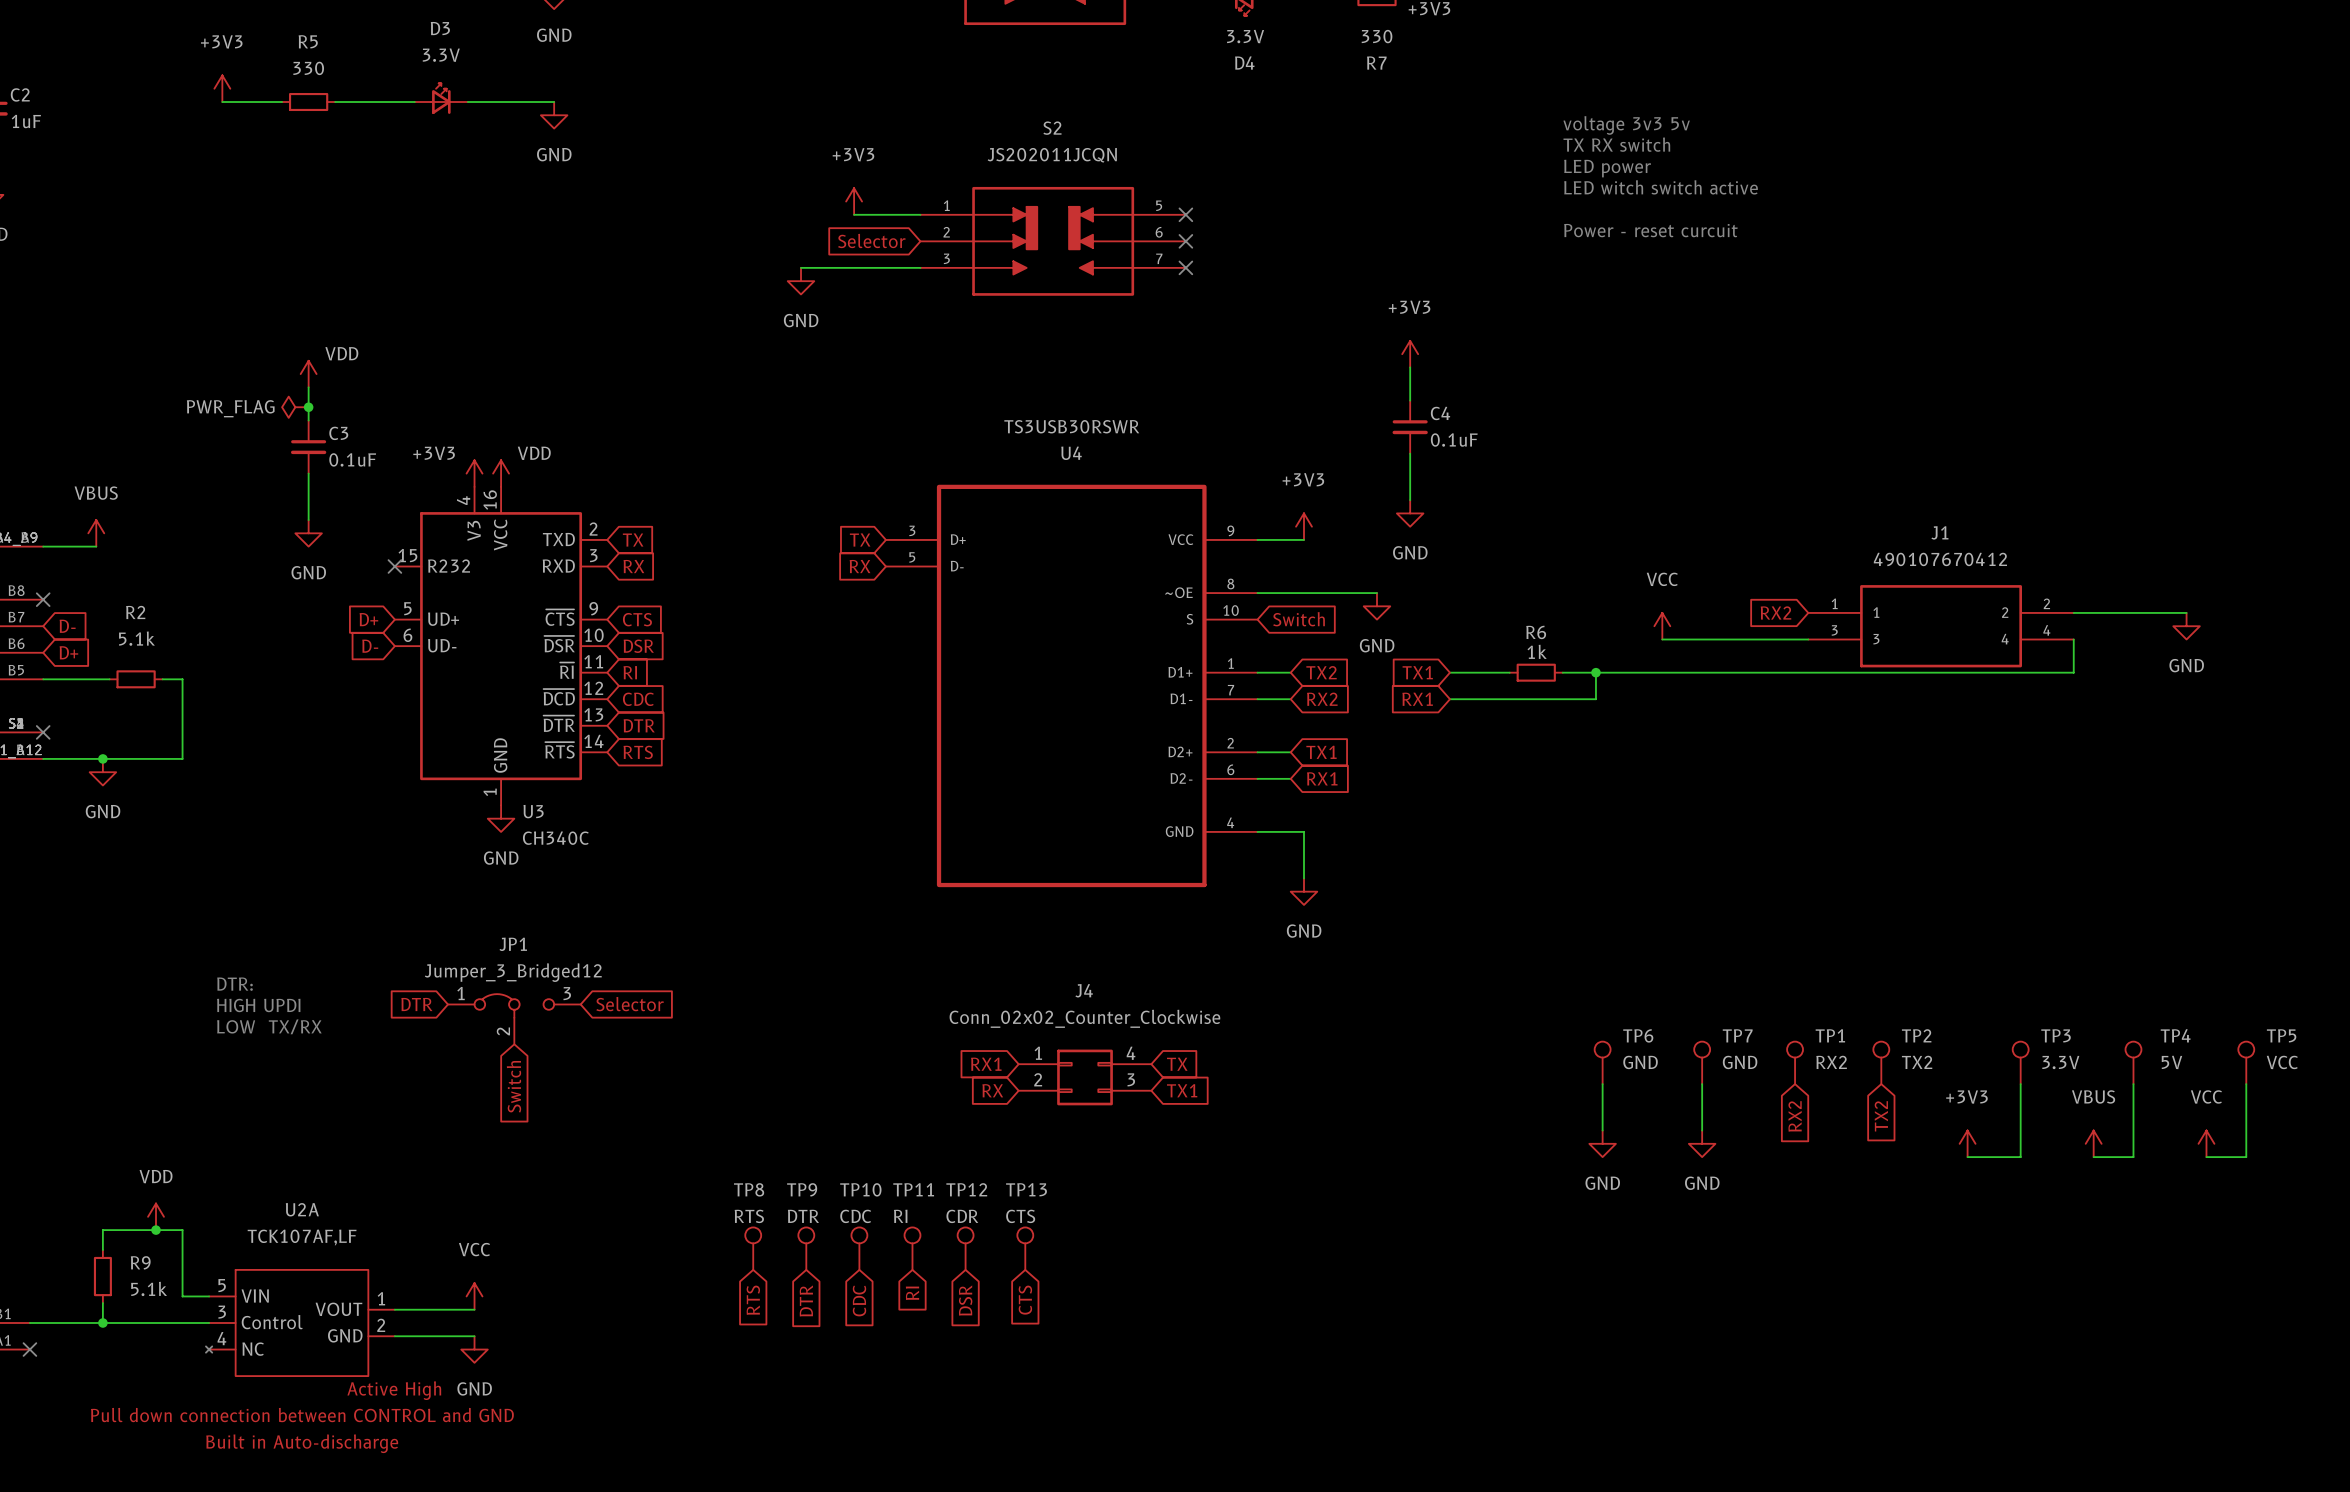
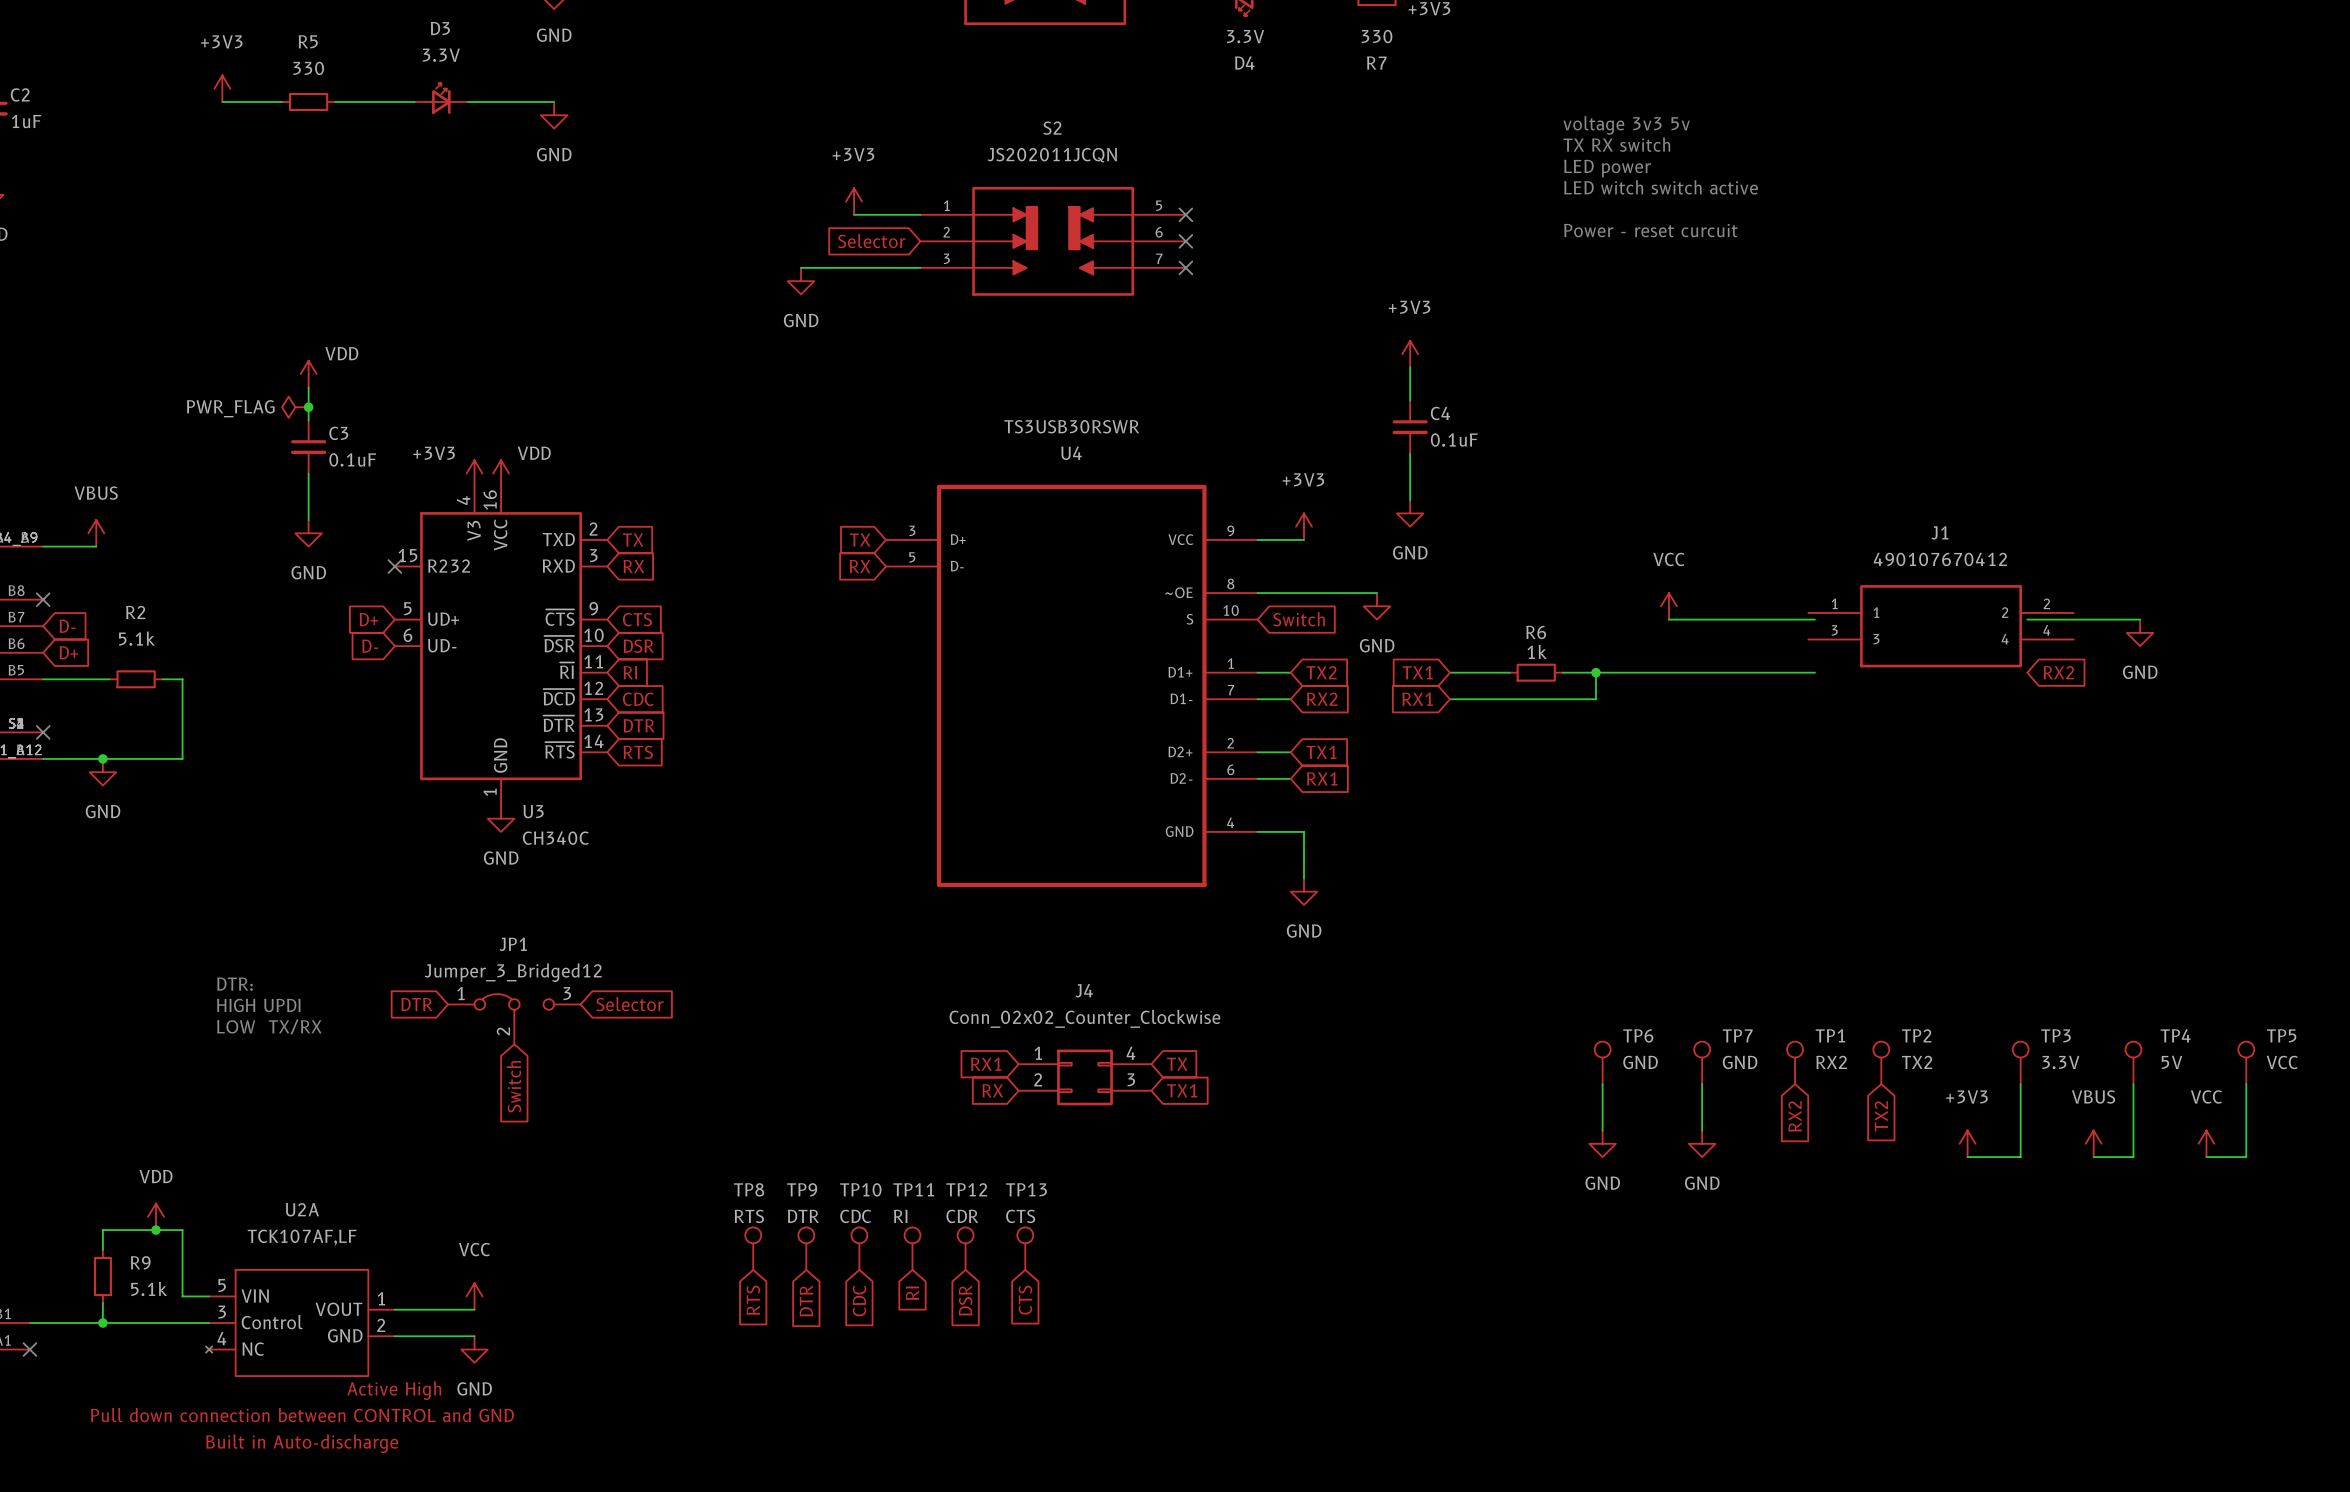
global label rotation: 0° (1775, 612) -> 180° (2058, 672)
global label position: RX2 (1775, 612) -> RX2 (2058, 672)
wire: (2073, 612) (2186, 612) -> (2027, 619) (2140, 619)
power symbol position: VCC (1662, 626) -> VCC (1668, 606)
power symbol position: GND (2186, 626) -> GND (2140, 632)
wire: (1662, 639) (1808, 639) -> (1668, 619) (1814, 619)
wire: (2073, 639) (2073, 672) (1814, 672) -> none

